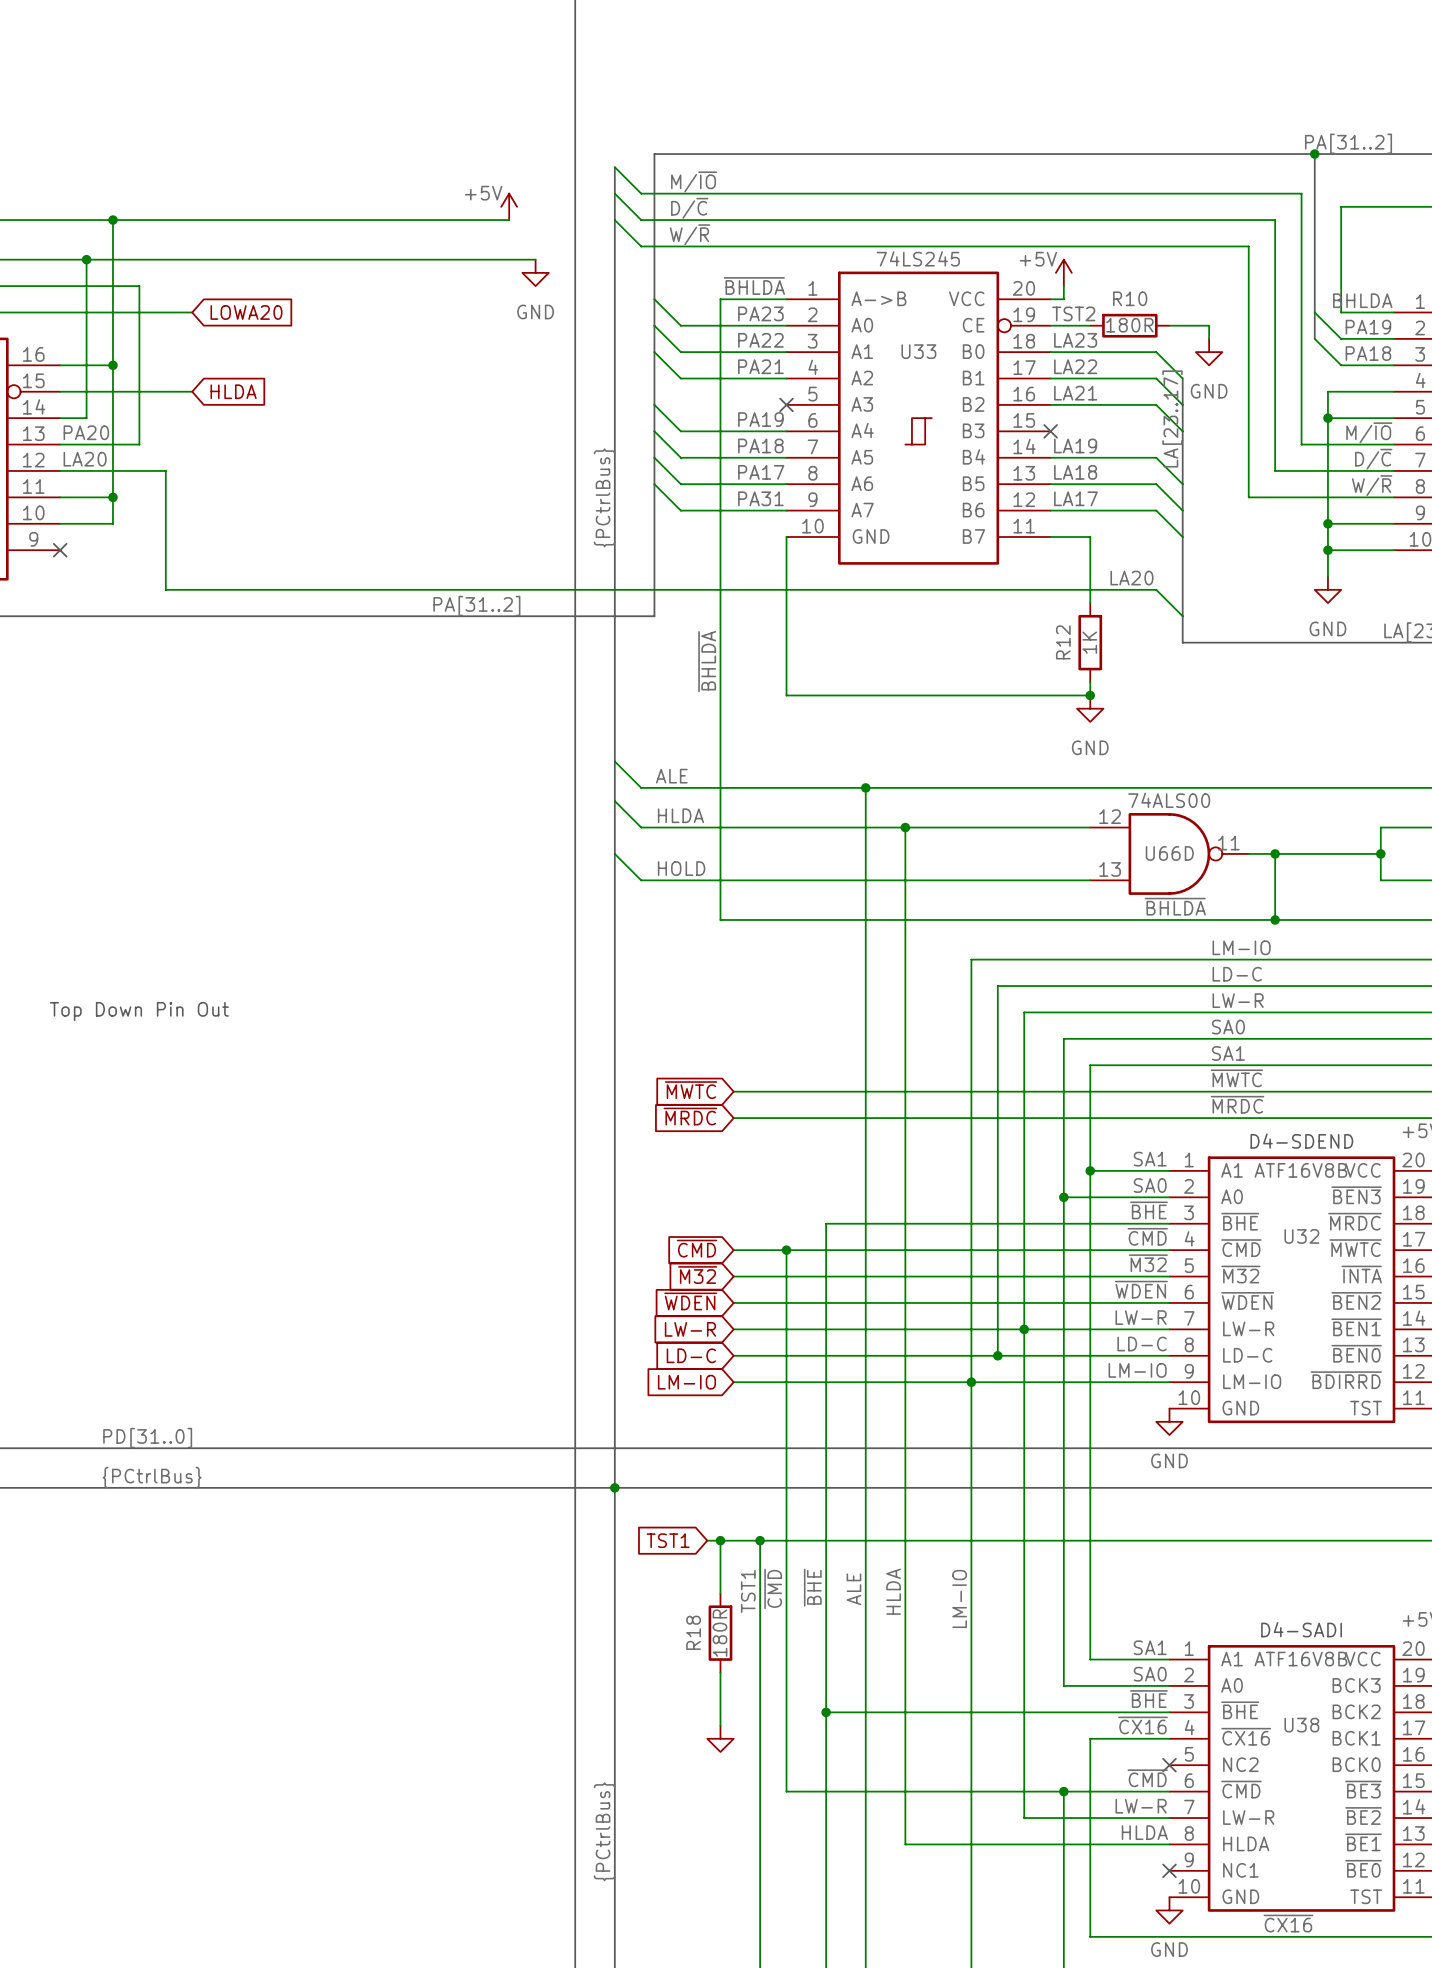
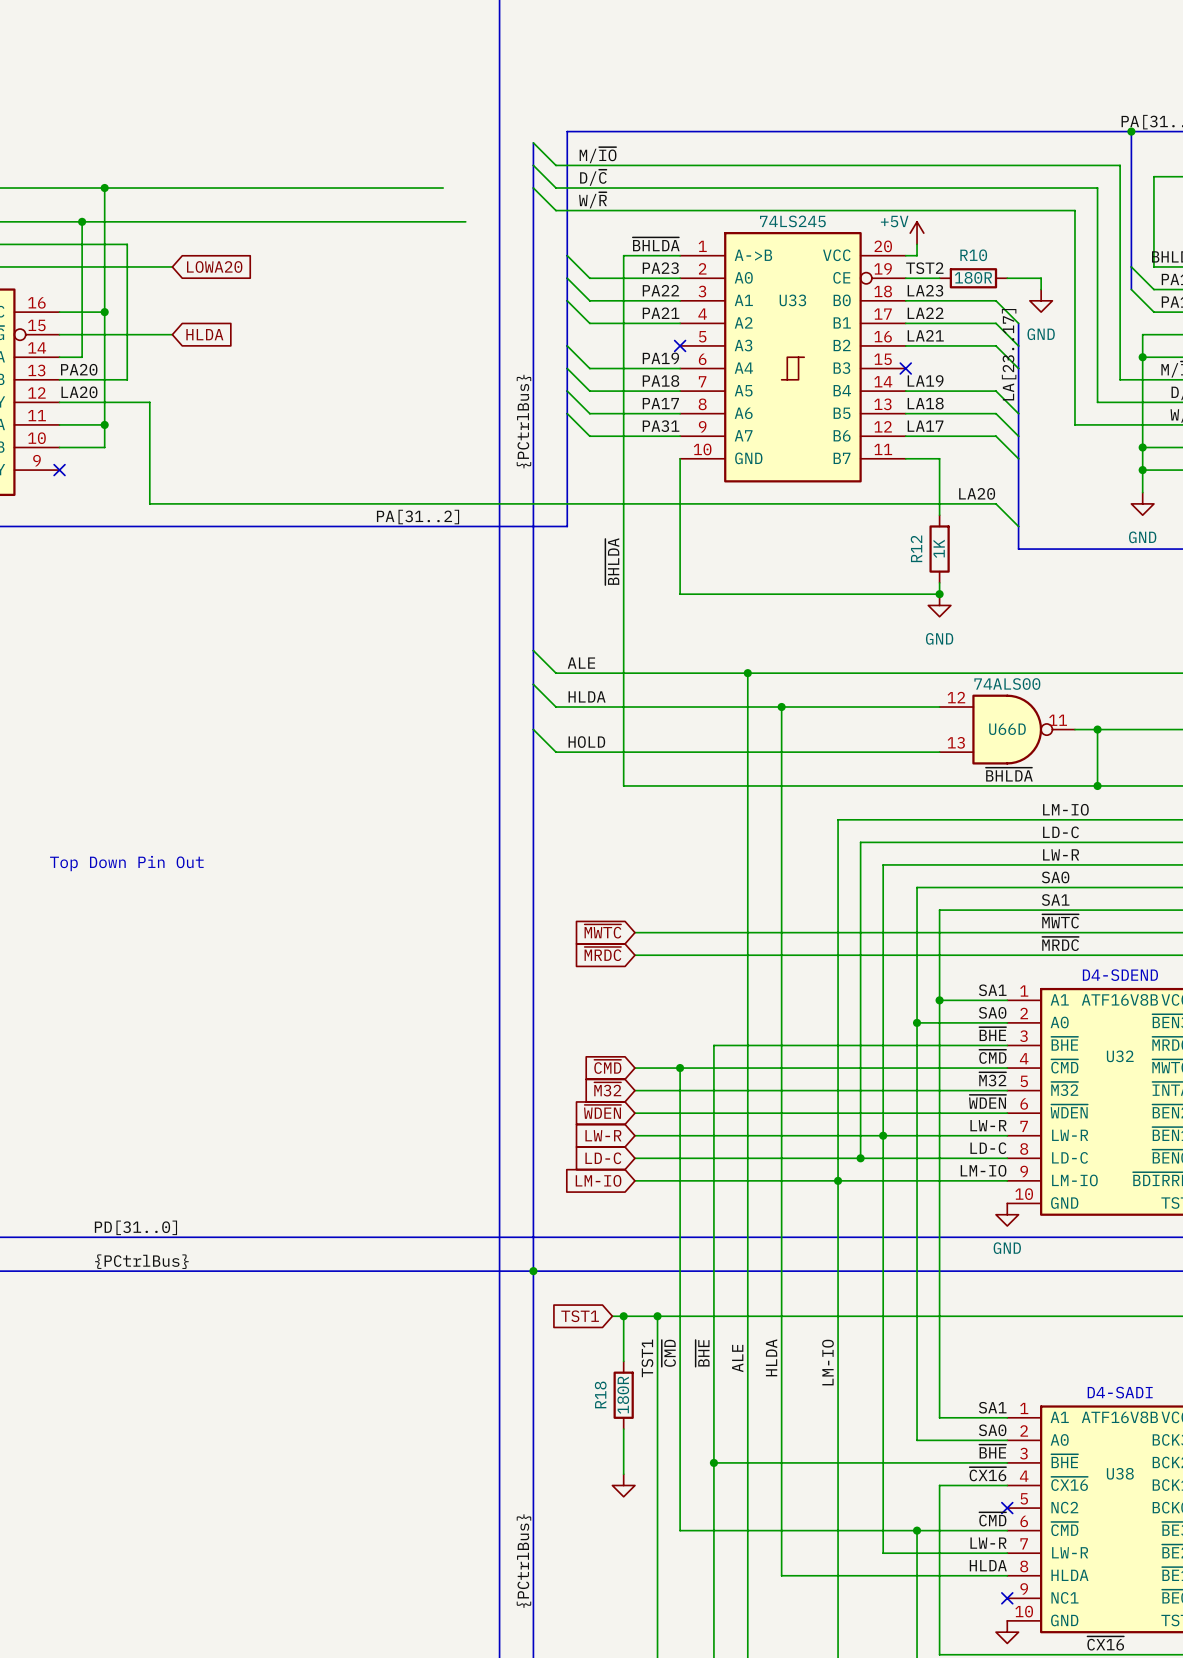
power symbol: +5V (509, 206) -> none
power symbol: GND (535, 272) -> none

